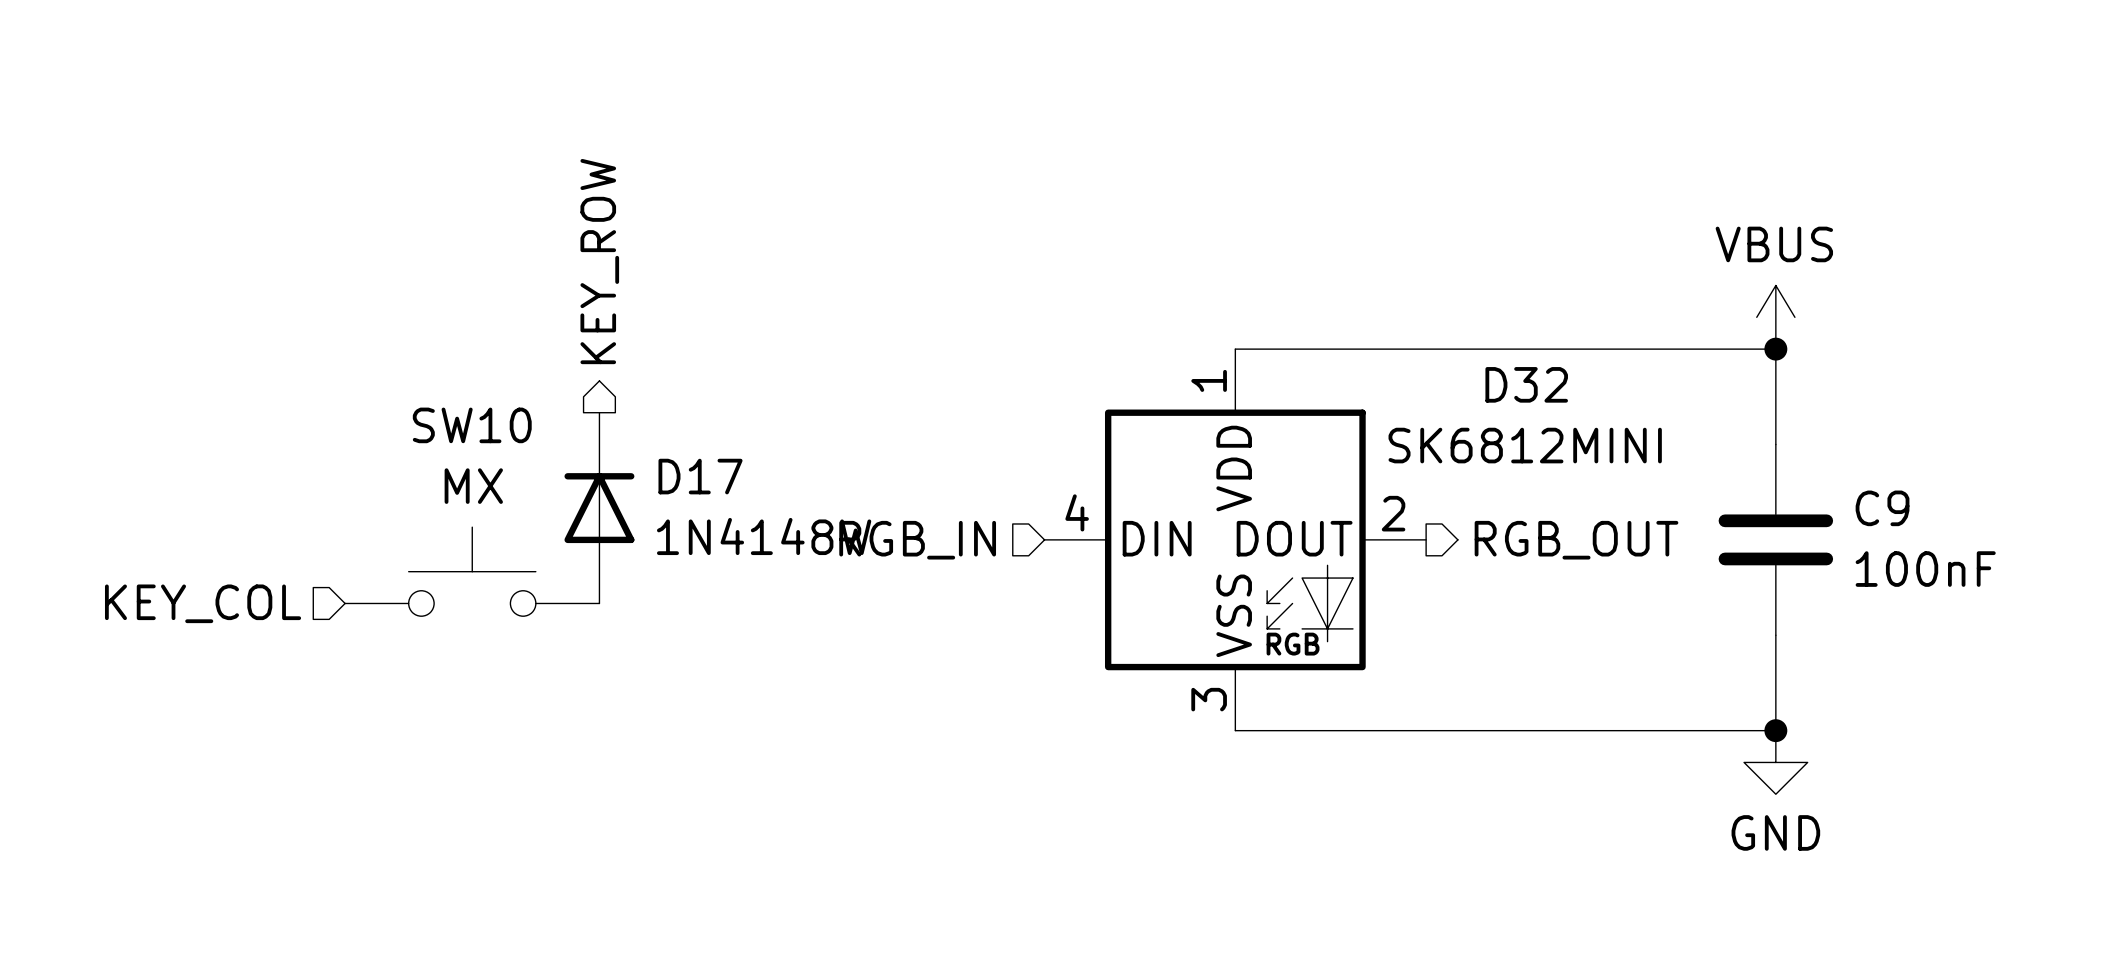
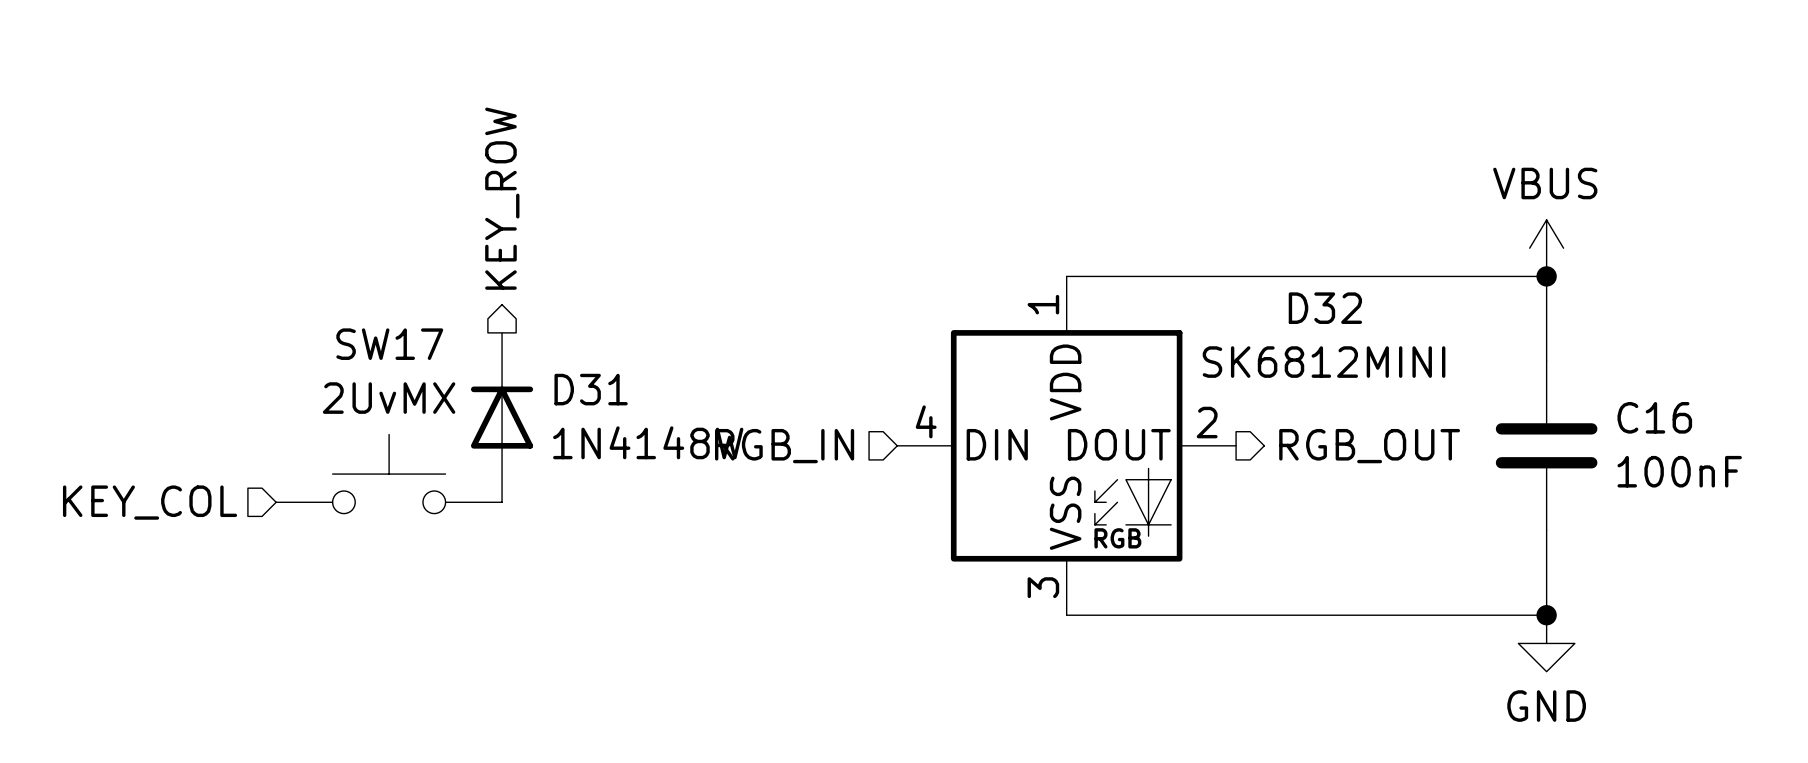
SW10 name: SW10 (472, 425) -> SW17 (389, 344)
D17 name: D17 (700, 476) -> D31 (591, 389)
SW10 value: MX (473, 486) -> 2UvMX (389, 398)
C9 name: C9 (1882, 508) -> C16 (1654, 417)

